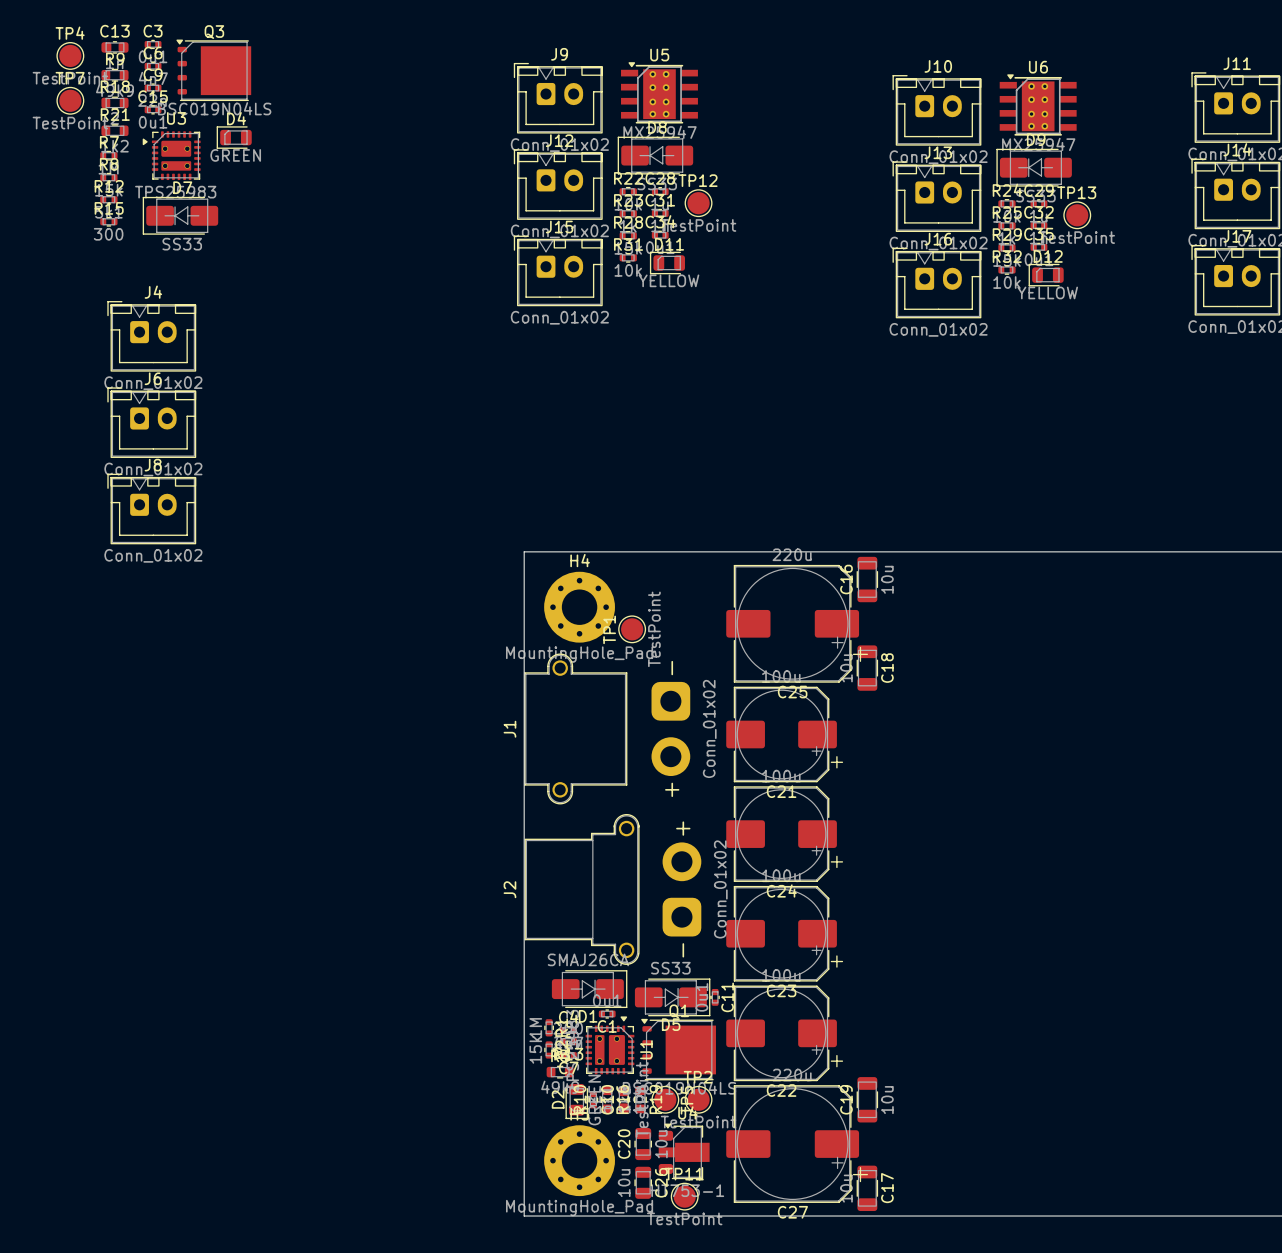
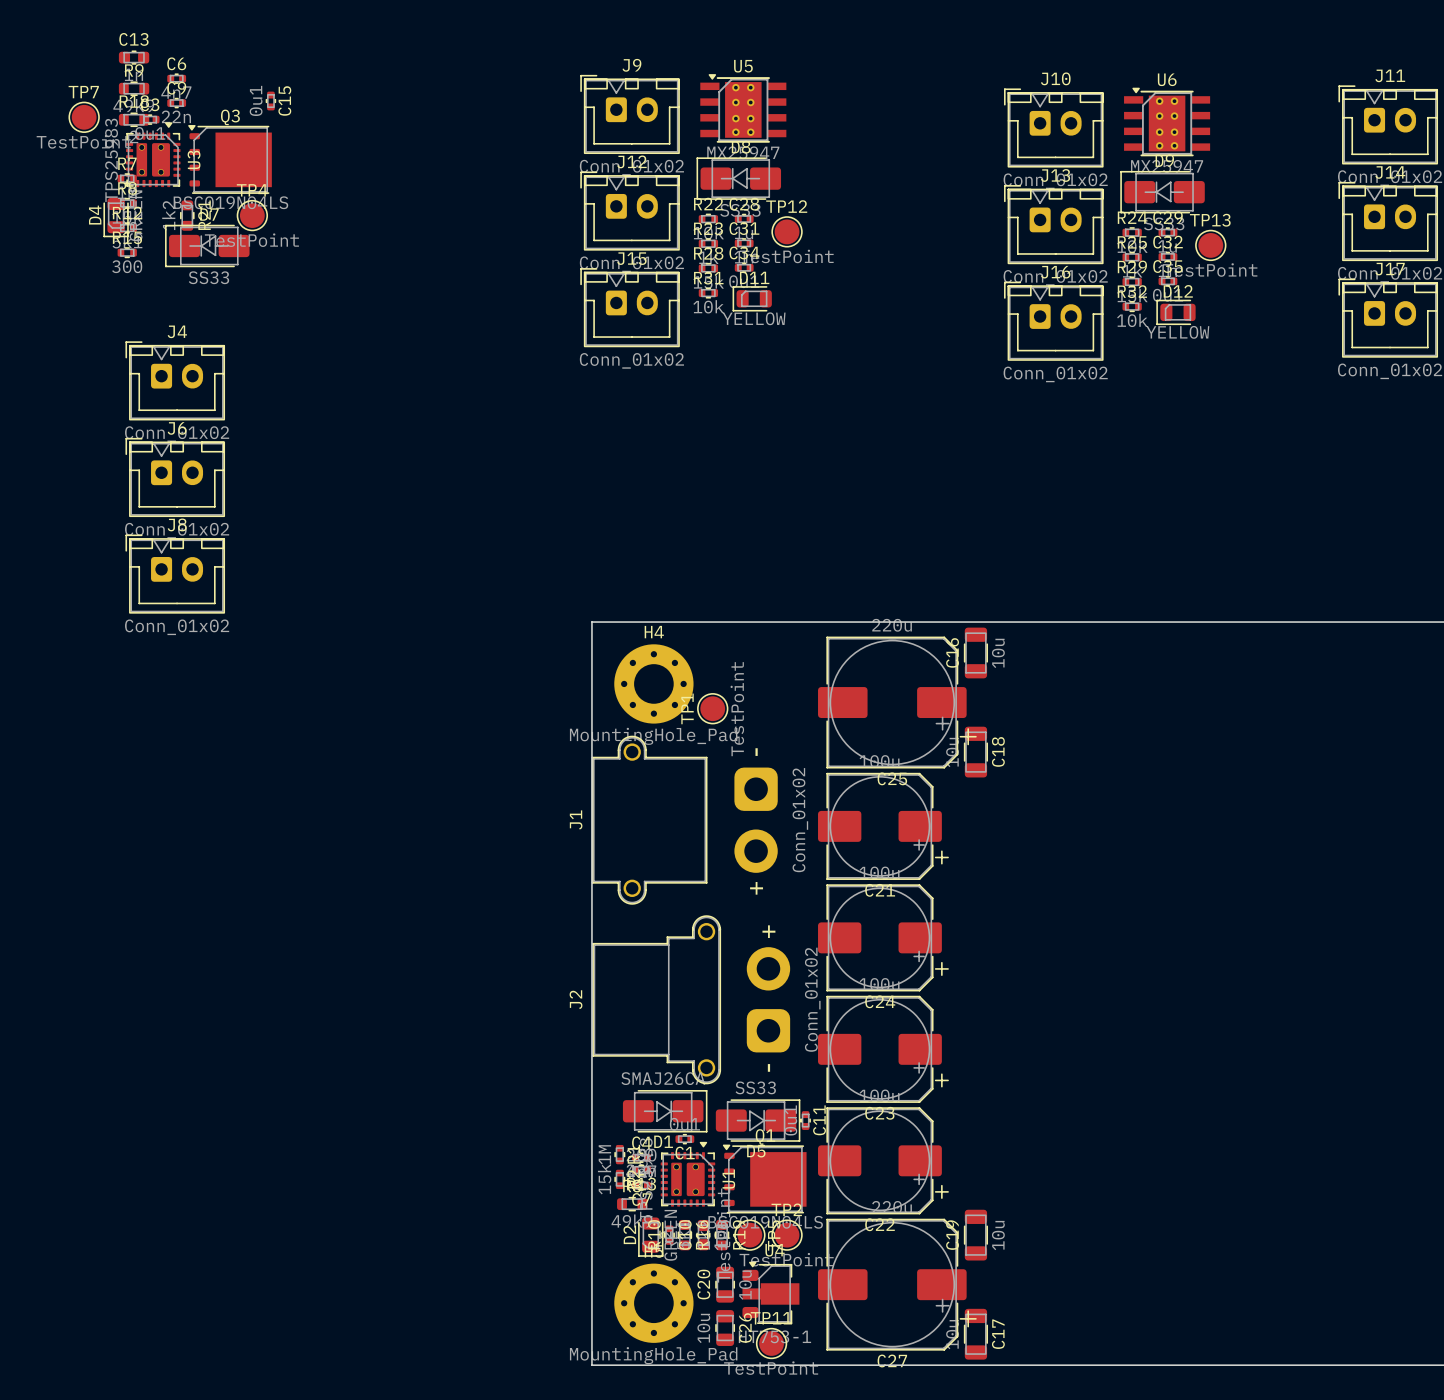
C3 position: (153, 44) -> (150, 119)
TP4 position: (70, 55) -> (252, 215)
Q3 position: (213, 70) -> (230, 159)
C15 rotation: 0° (153, 109) -> 90° clockwise (270, 101)
C15 position: (153, 109) -> (270, 101)
R21 rotation: 0° (114, 130) -> 90° clockwise (187, 215)
R21 position: (114, 130) -> (187, 215)
D4 rotation: 0° (234, 137) -> 90° counterclockwise (116, 217)
D4 position: (234, 137) -> (116, 217)
U3 rotation: 0° (171, 155) -> 90° clockwise (153, 154)
U3 position: (171, 155) -> (153, 154)

